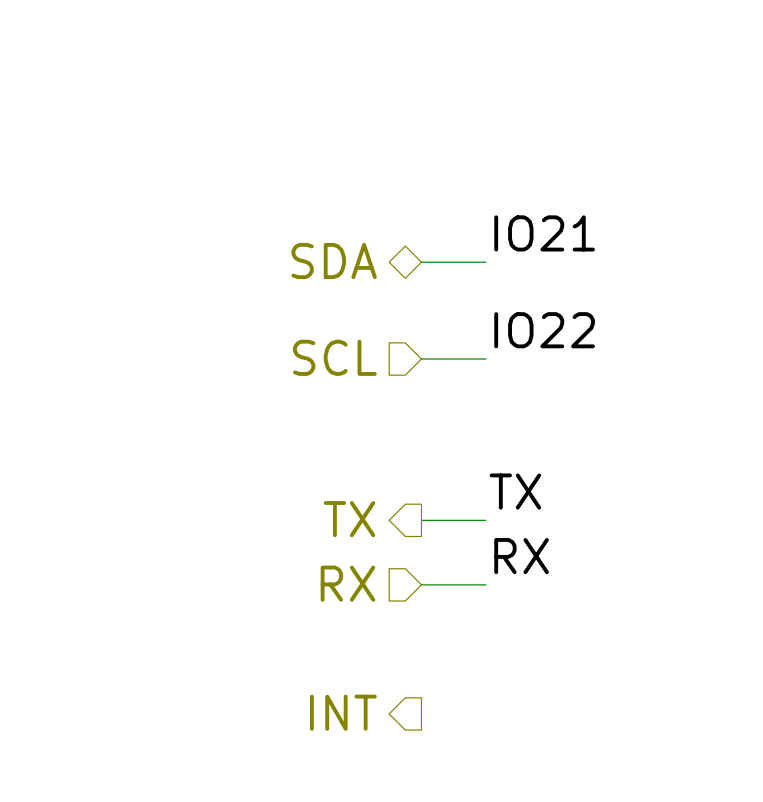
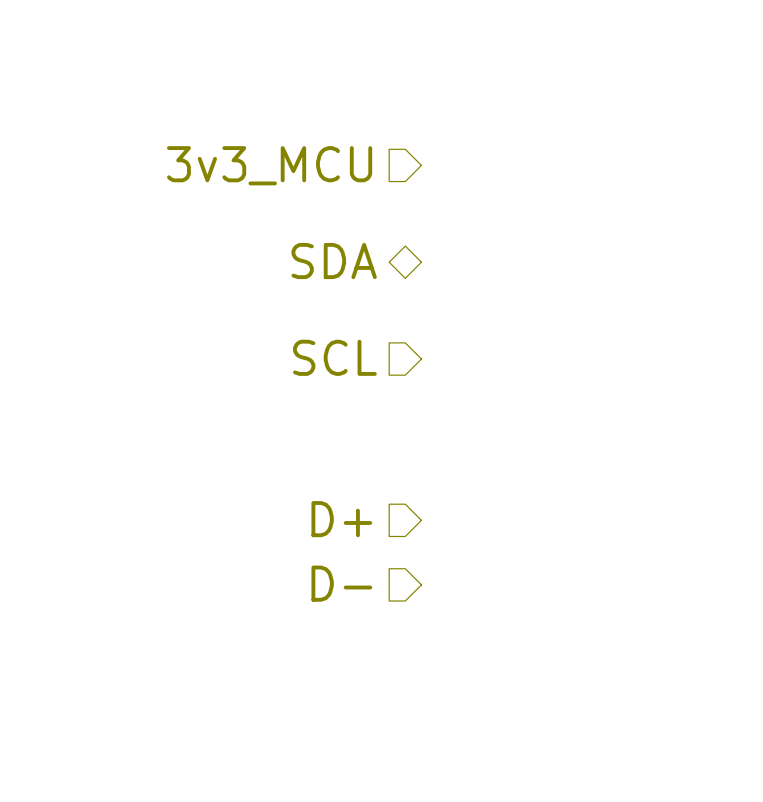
hierarchical label: none -> 3v3_MCU (269, 165)
label: IO21 (544, 233) -> none
wire: (421, 262) (485, 262) -> none
label: IO22 (544, 330) -> none
wire: (421, 359) (485, 359) -> none
label: TX (515, 491) -> none
hierarchical label shape: output (349, 519) -> input (341, 519)
hierarchical label: TX (349, 519) -> D+ (341, 519)
wire: (421, 520) (485, 520) -> none
label: RX (521, 556) -> none
hierarchical label: RX (347, 583) -> D- (341, 583)
wire: (421, 584) (485, 584) -> none
hierarchical label: INT (343, 712) -> none

